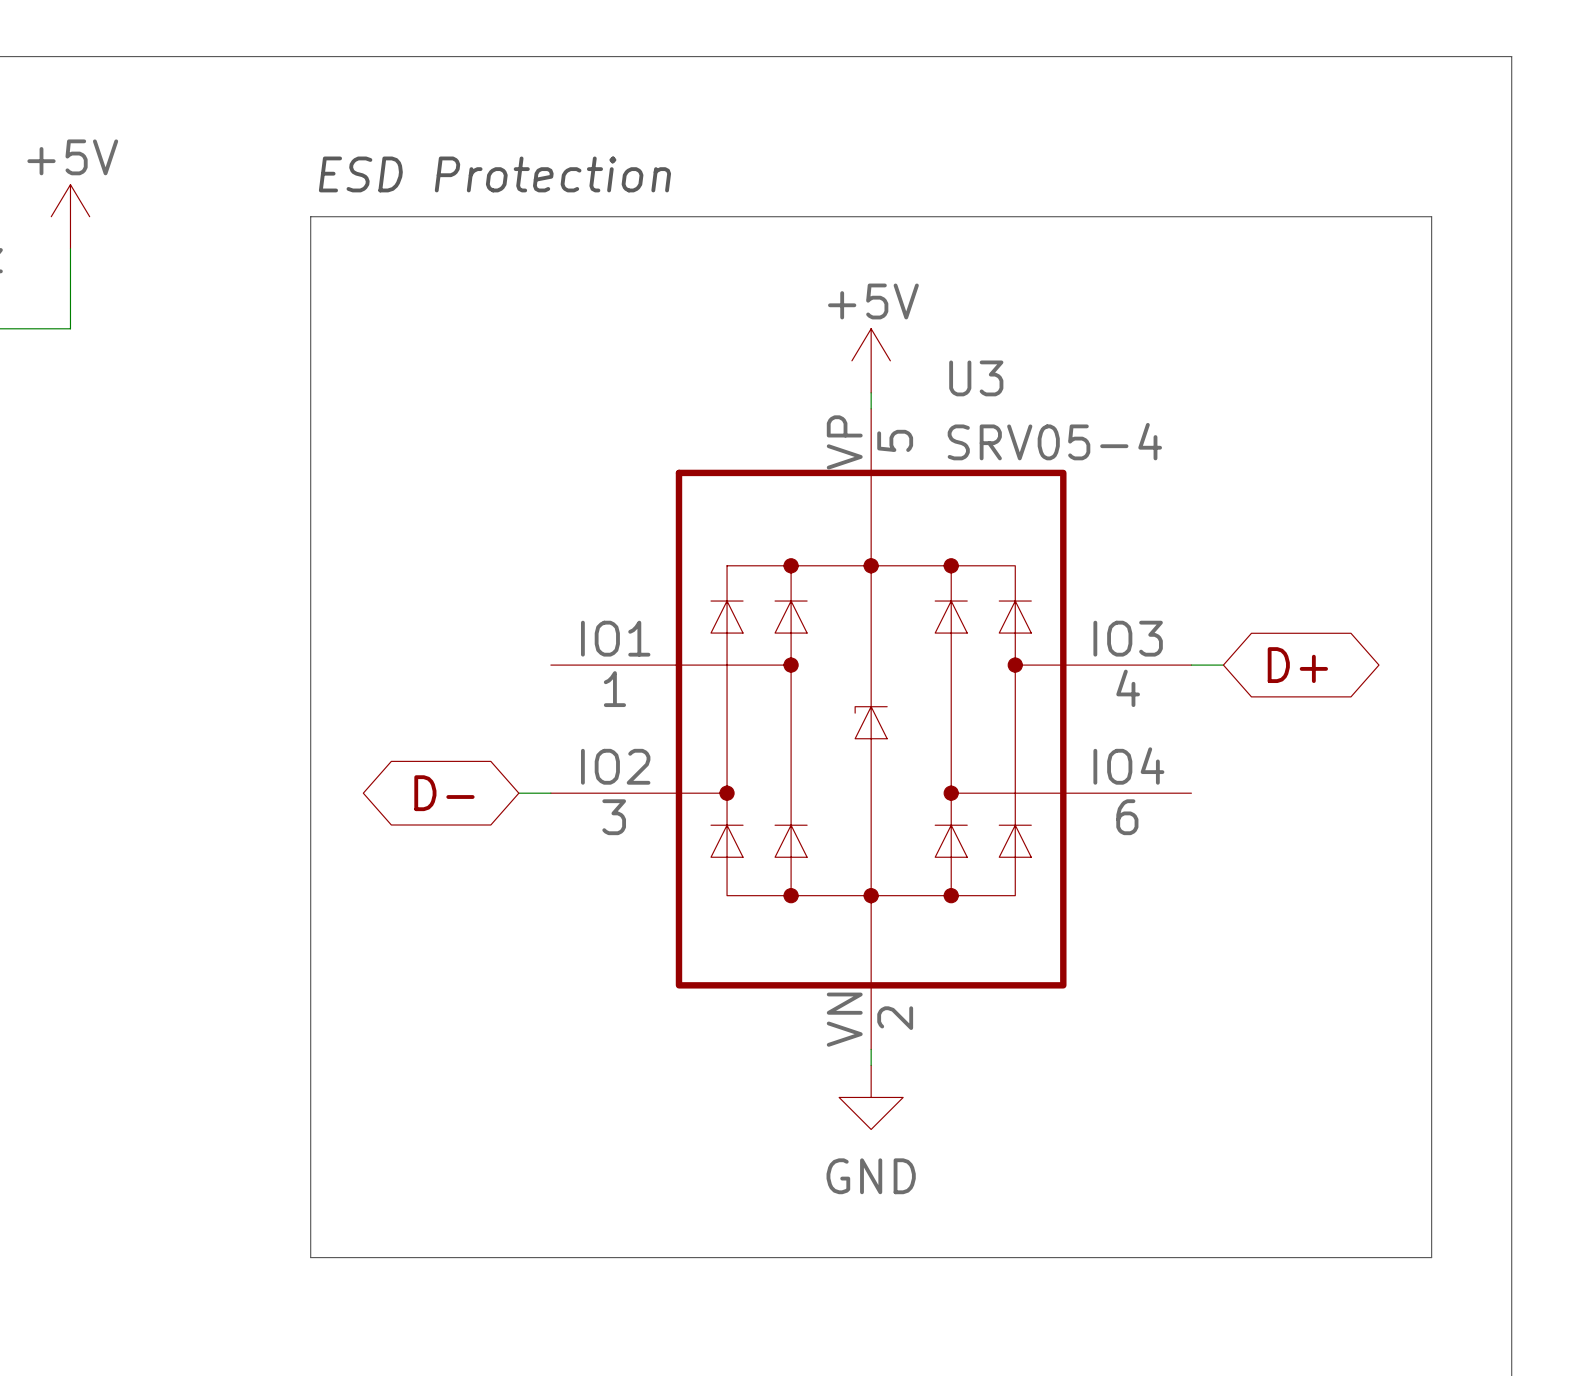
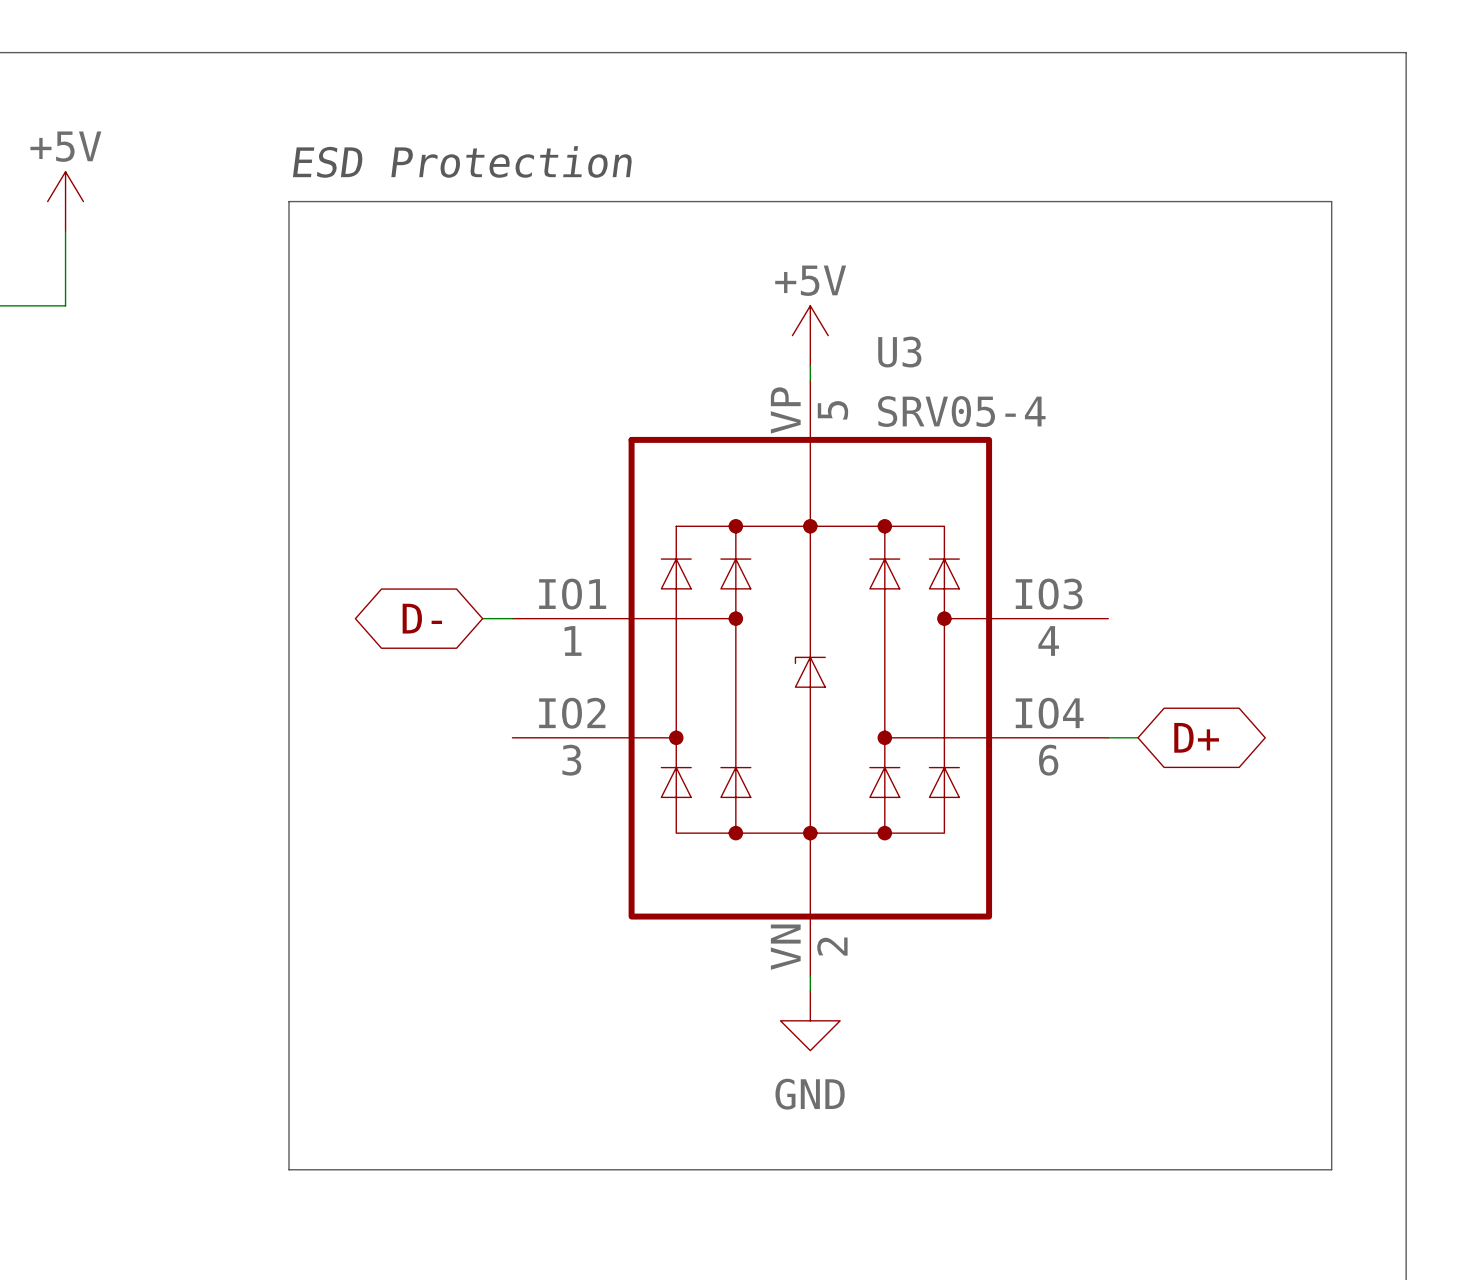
wire: (1191, 665) (1223, 665) -> (1108, 737) (1138, 737)
global label position: D+ (1297, 665) -> D+ (1196, 737)
global label position: D- (444, 793) -> D- (422, 618)
wire: (518, 793) (550, 793) -> (482, 618) (512, 618)

